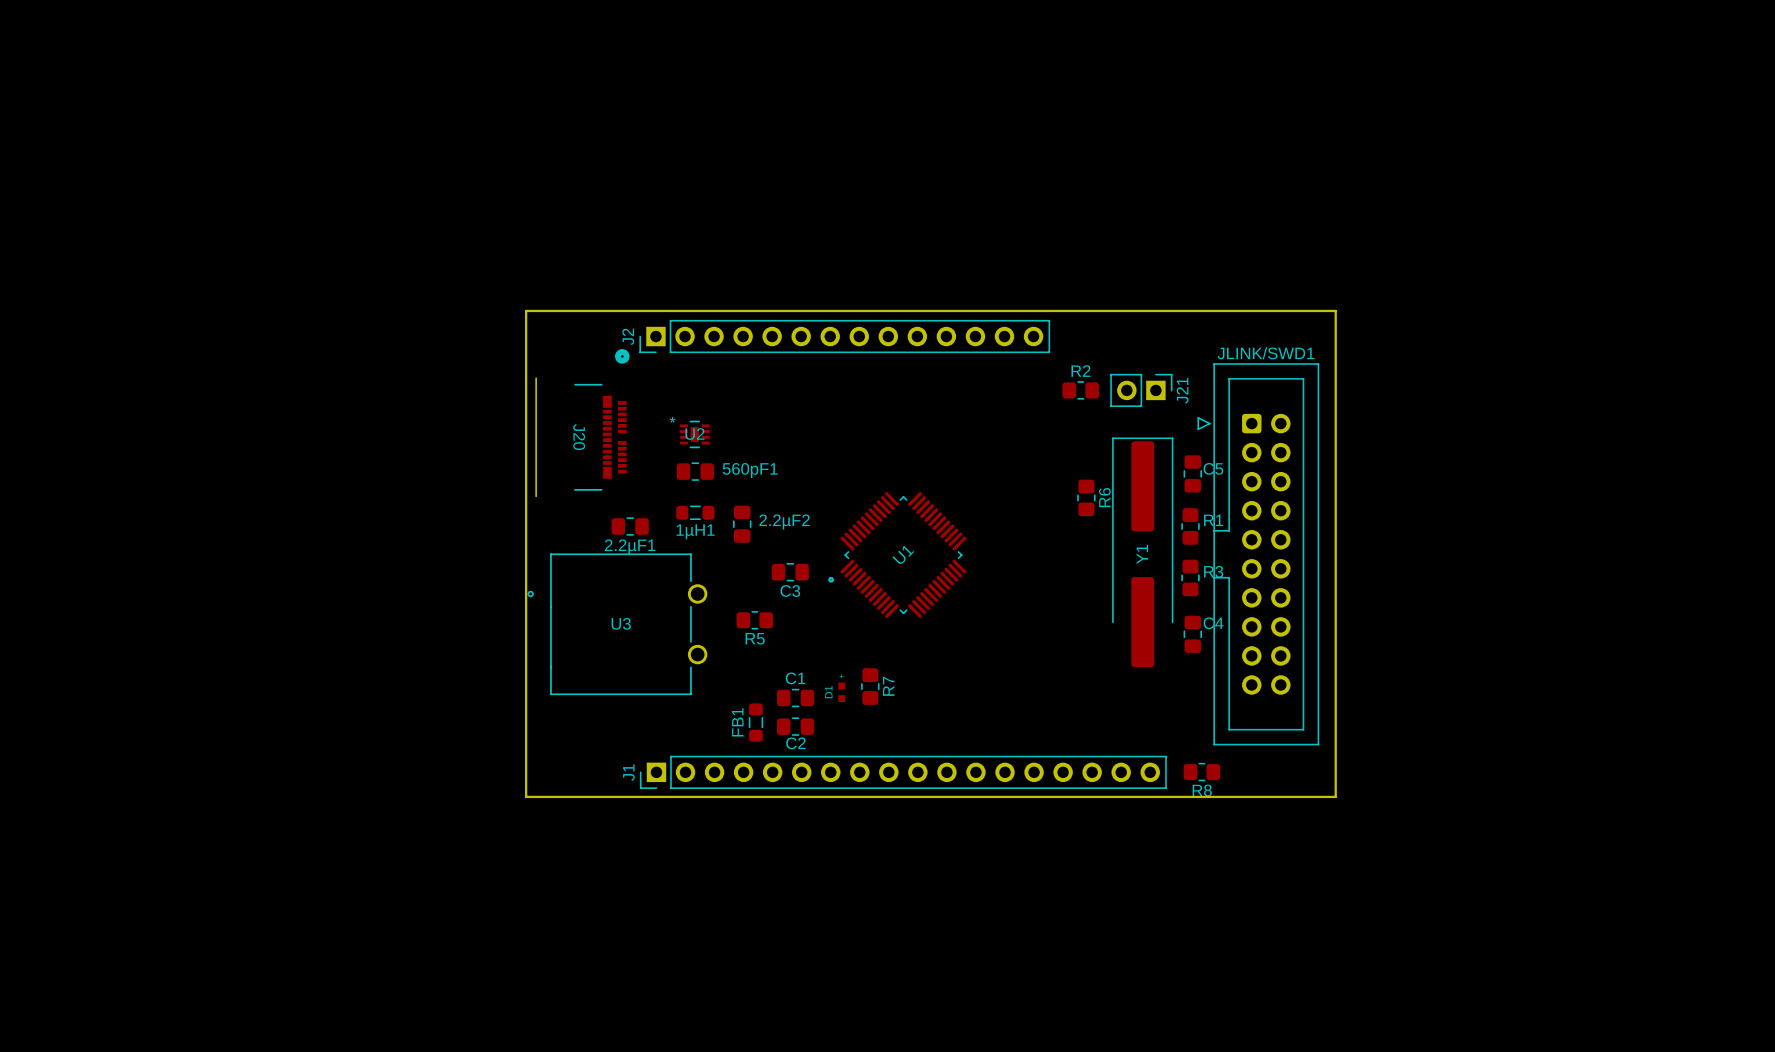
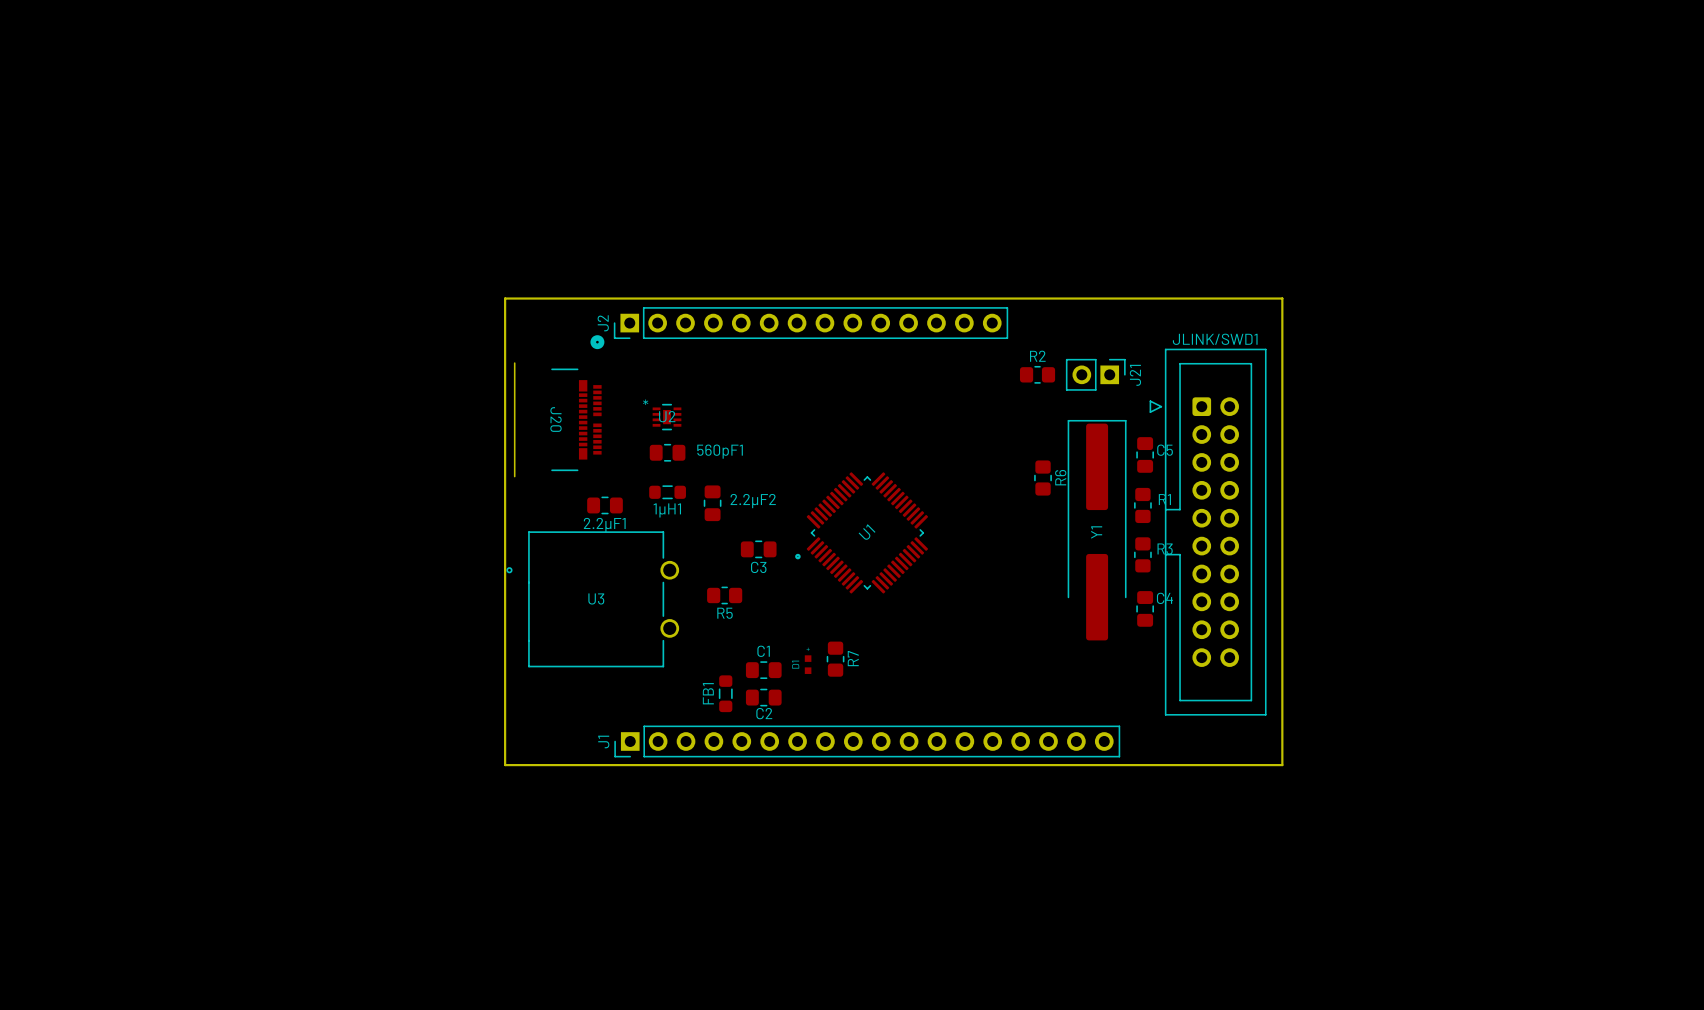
R8: (1201, 772) -> none

